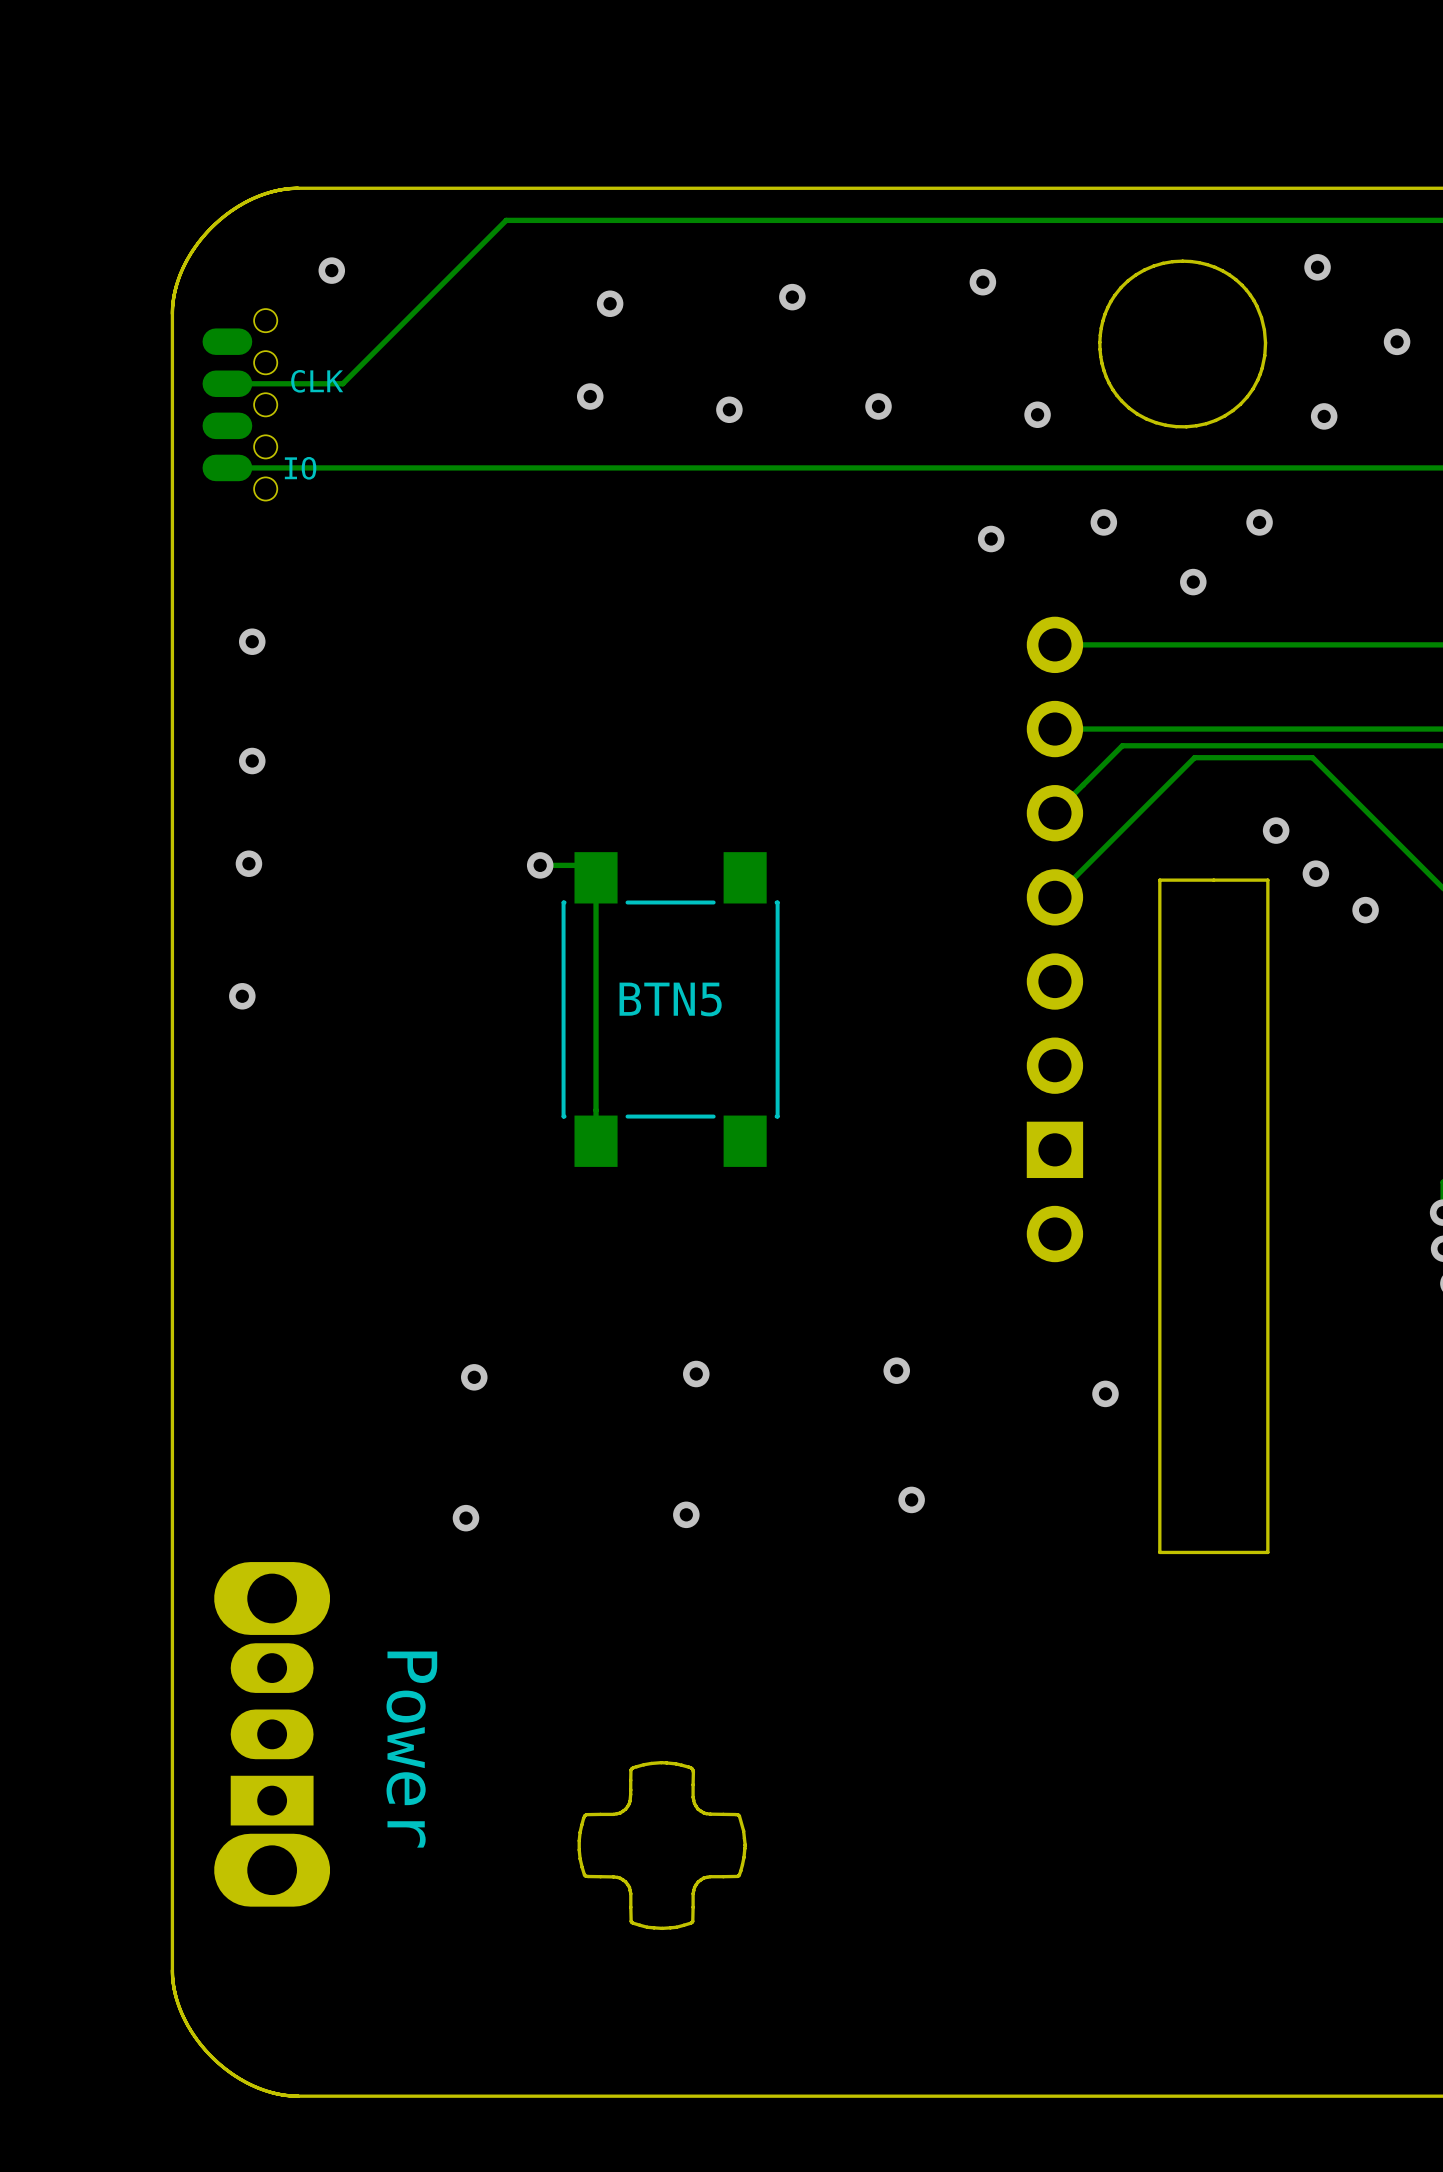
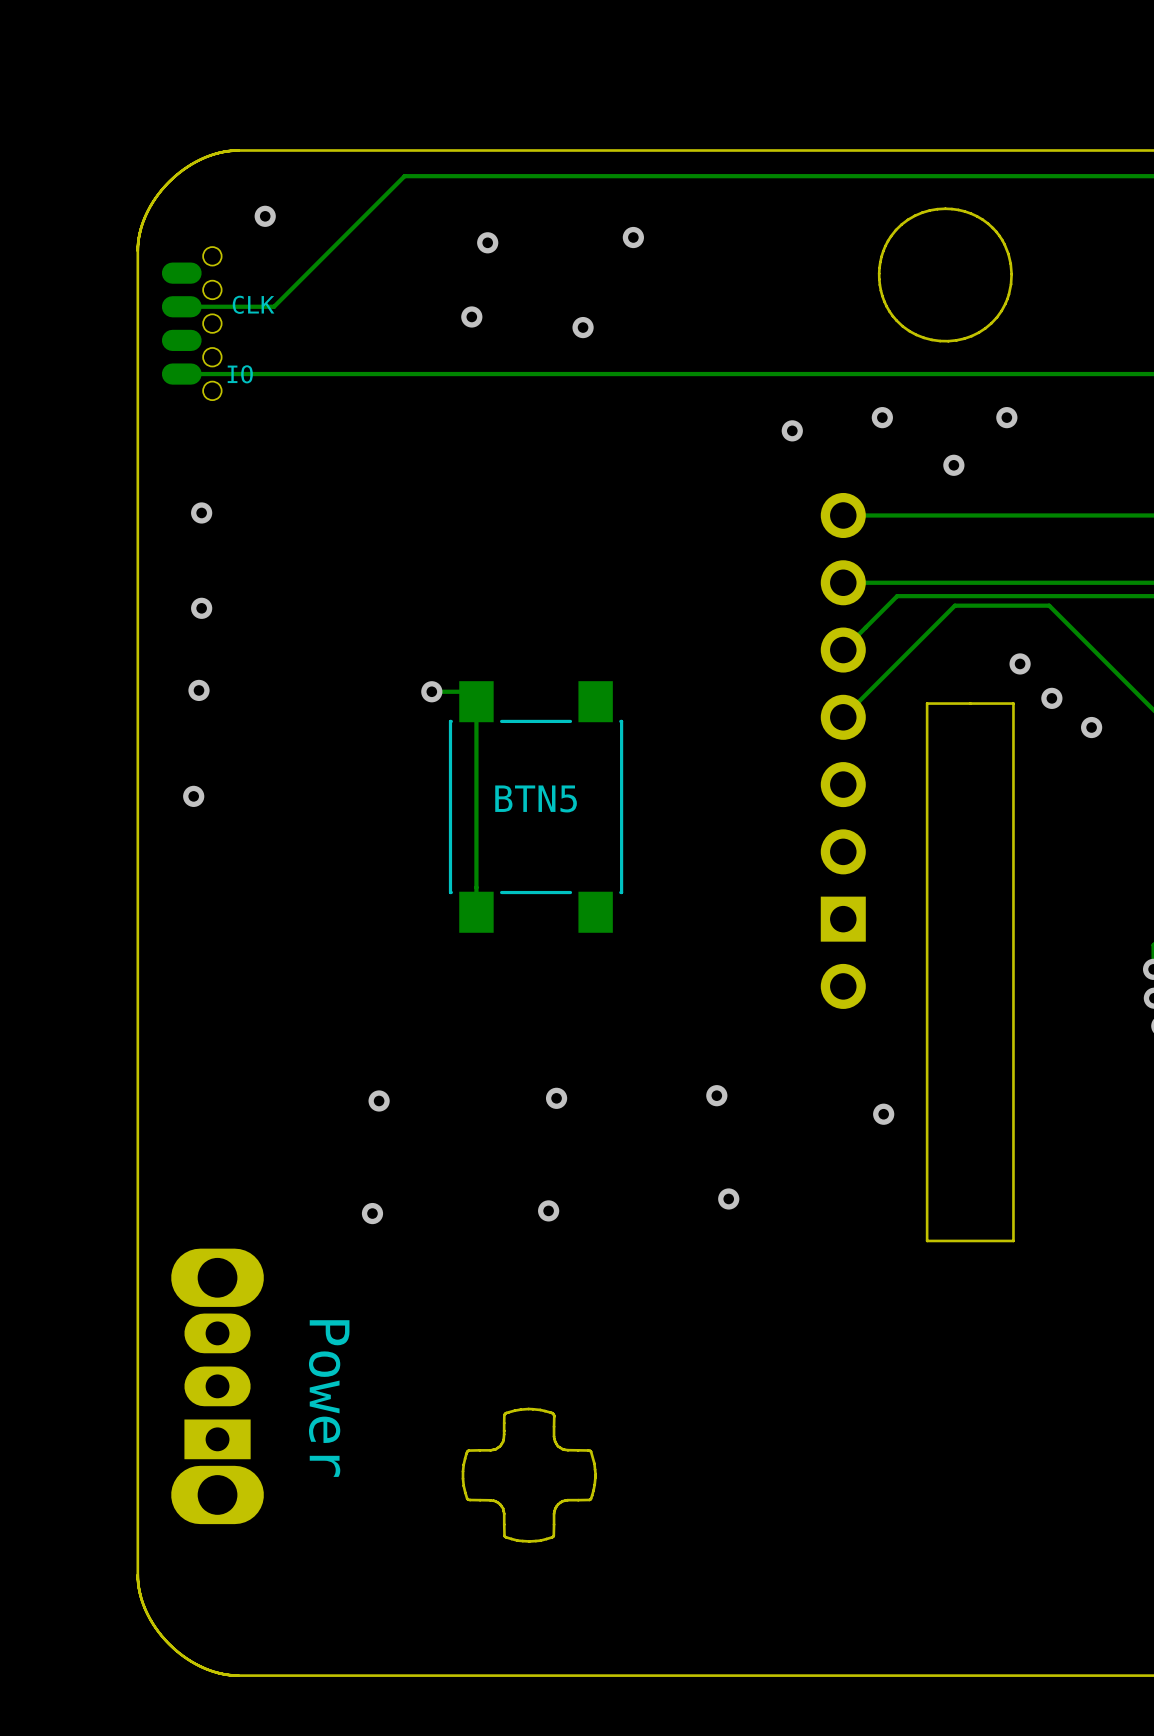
via: (1317, 267) -> none
via: (982, 282) -> none
via: (1397, 341) -> none
via: (878, 406) -> none
via: (1037, 414) -> none
via: (1324, 416) -> none

